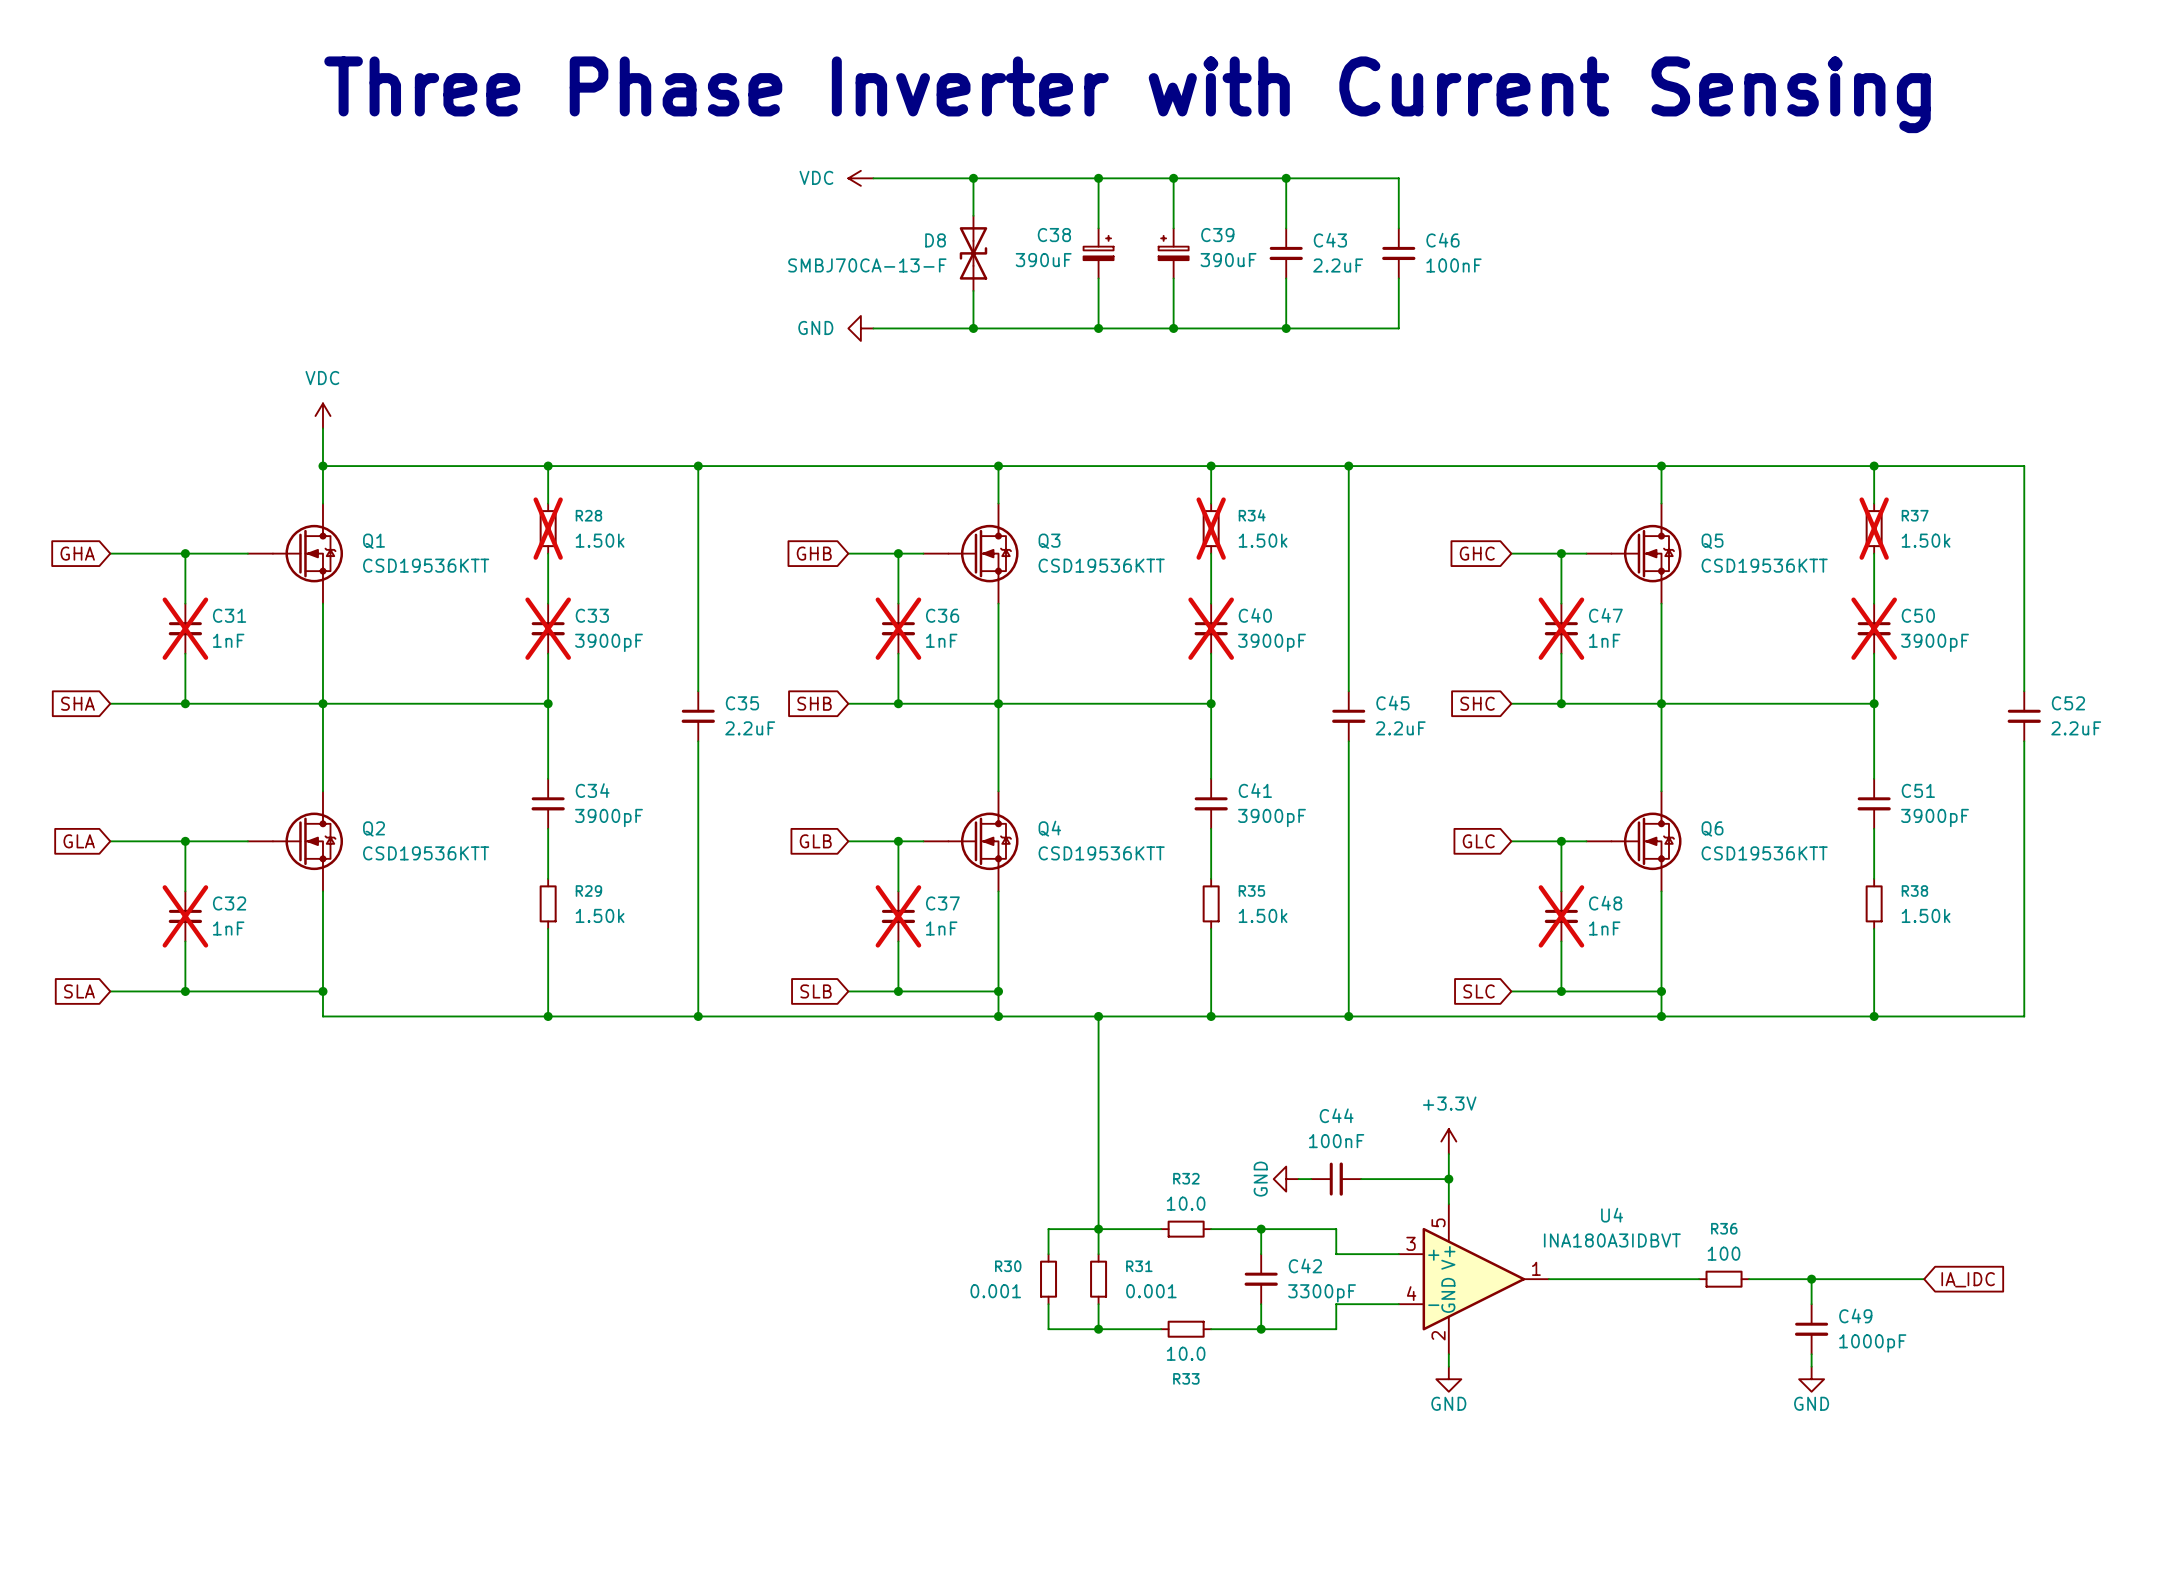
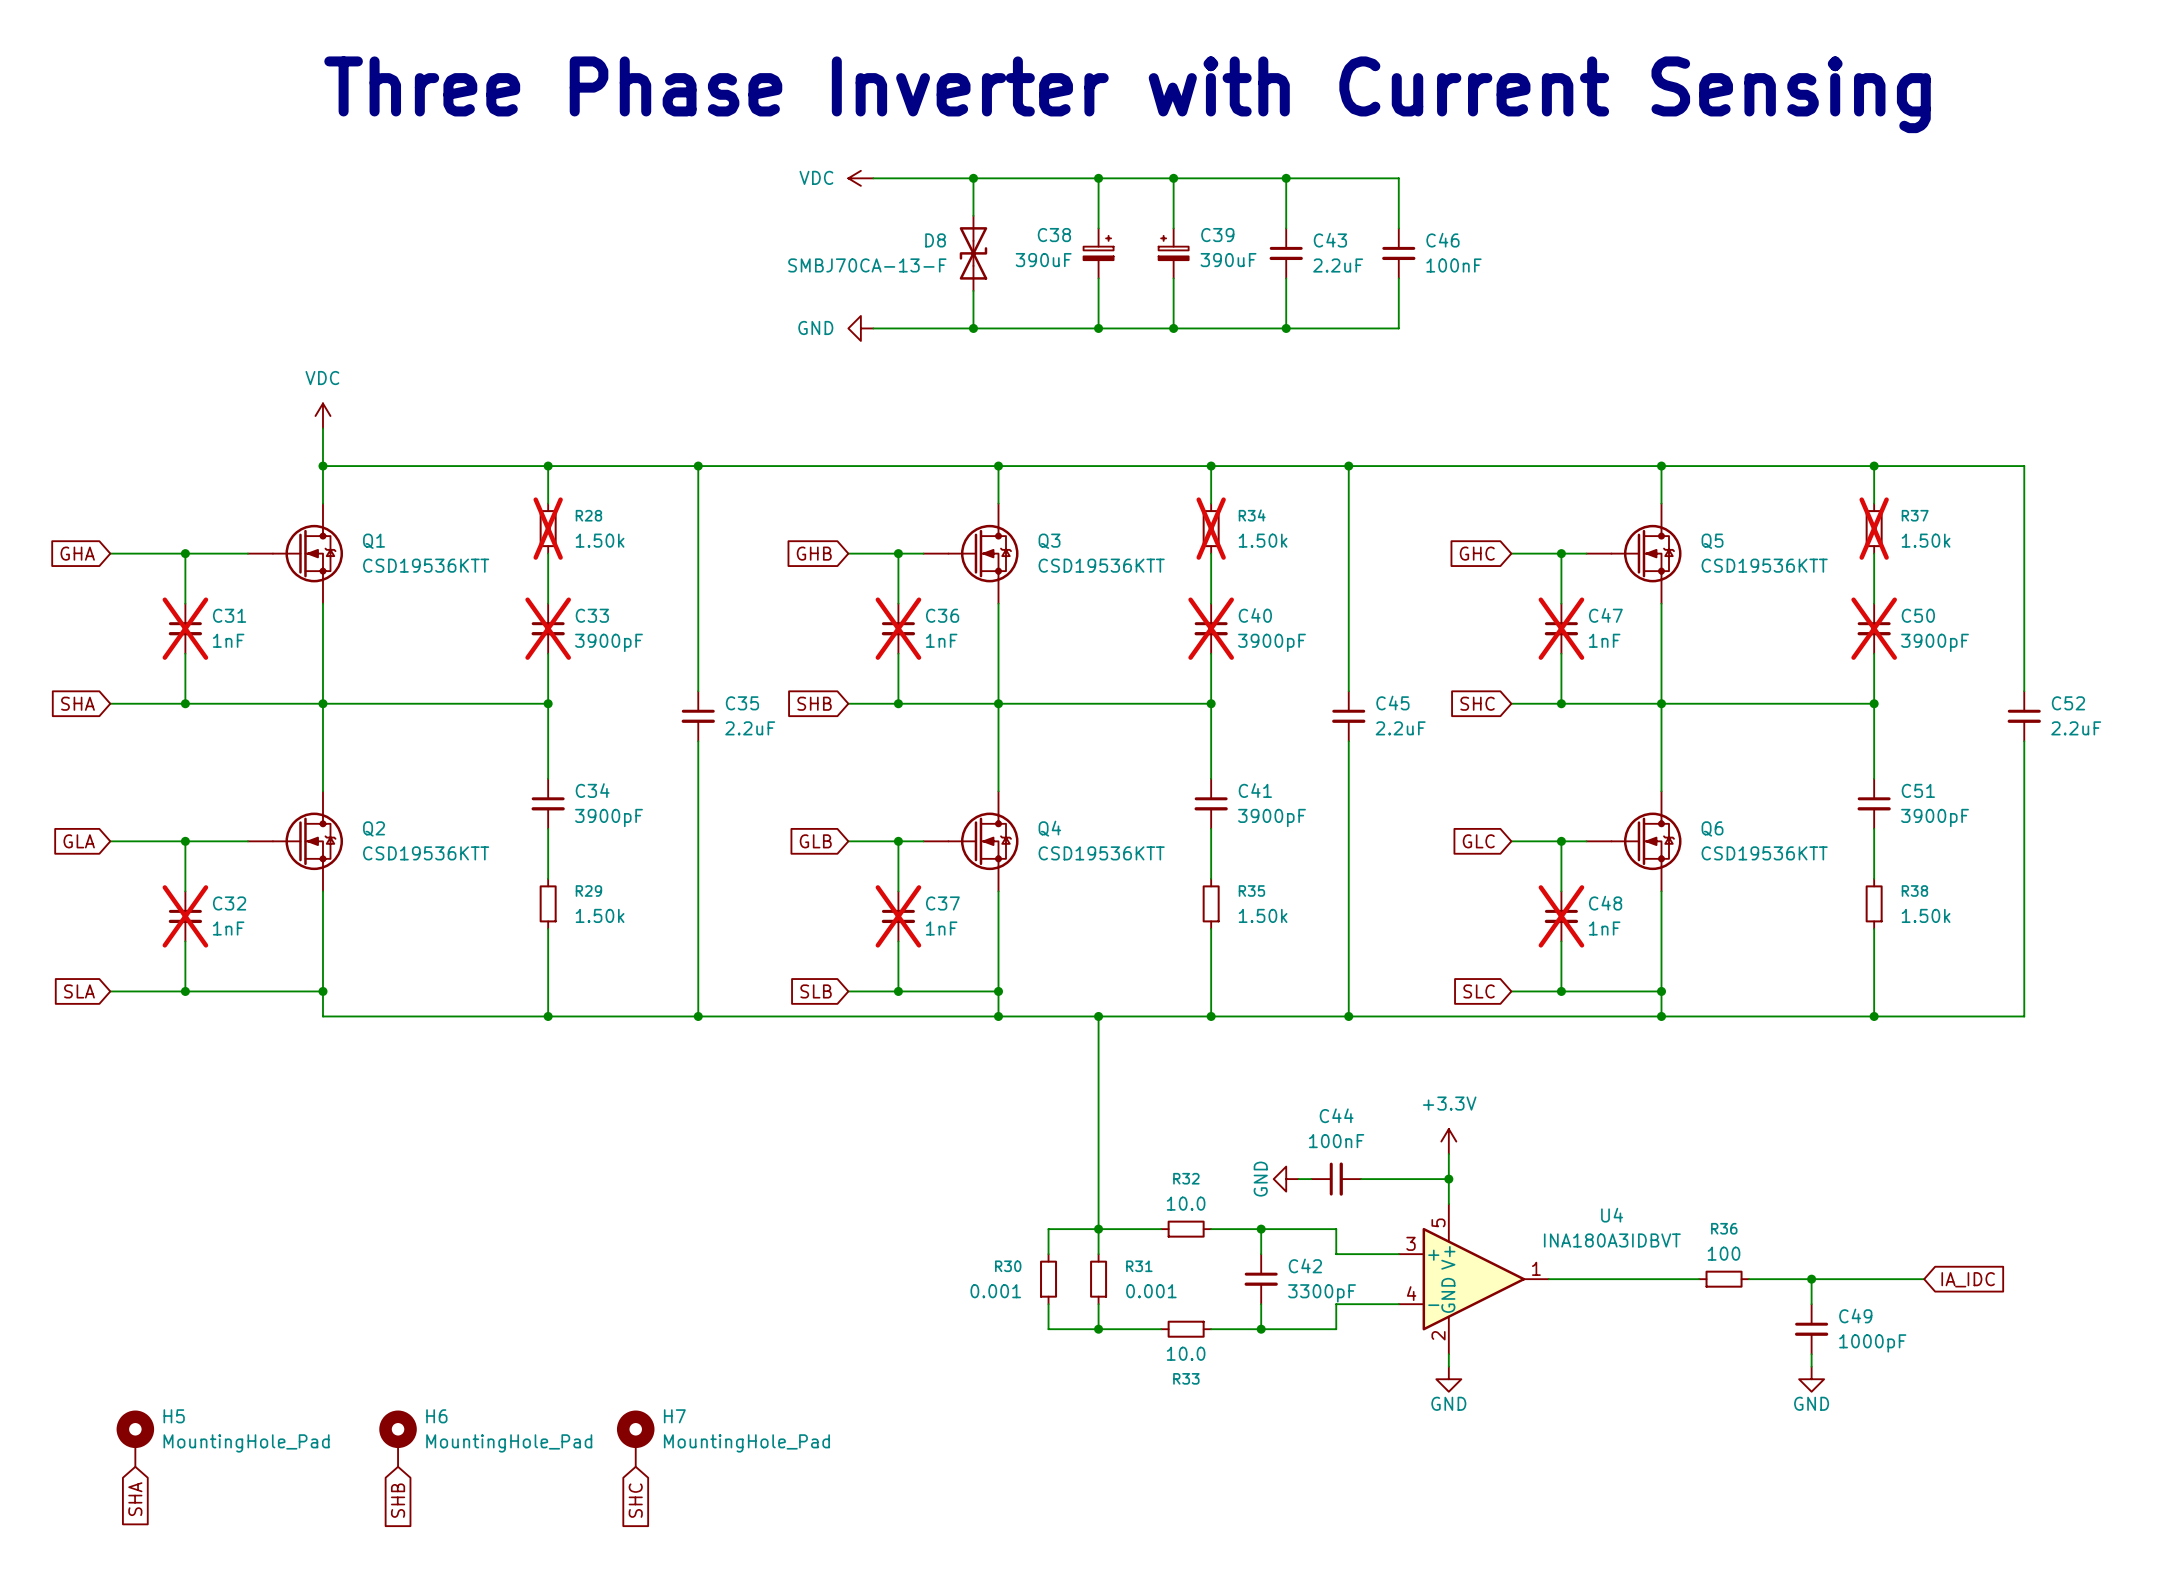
H5: none -> MountingHole_Pad (135, 1438)
H6: none -> MountingHole_Pad (398, 1438)
H7: none -> MountingHole_Pad (635, 1438)
global label: none -> SHA (135, 1499)
global label: none -> SHB (398, 1500)
global label: none -> SHC (635, 1500)

